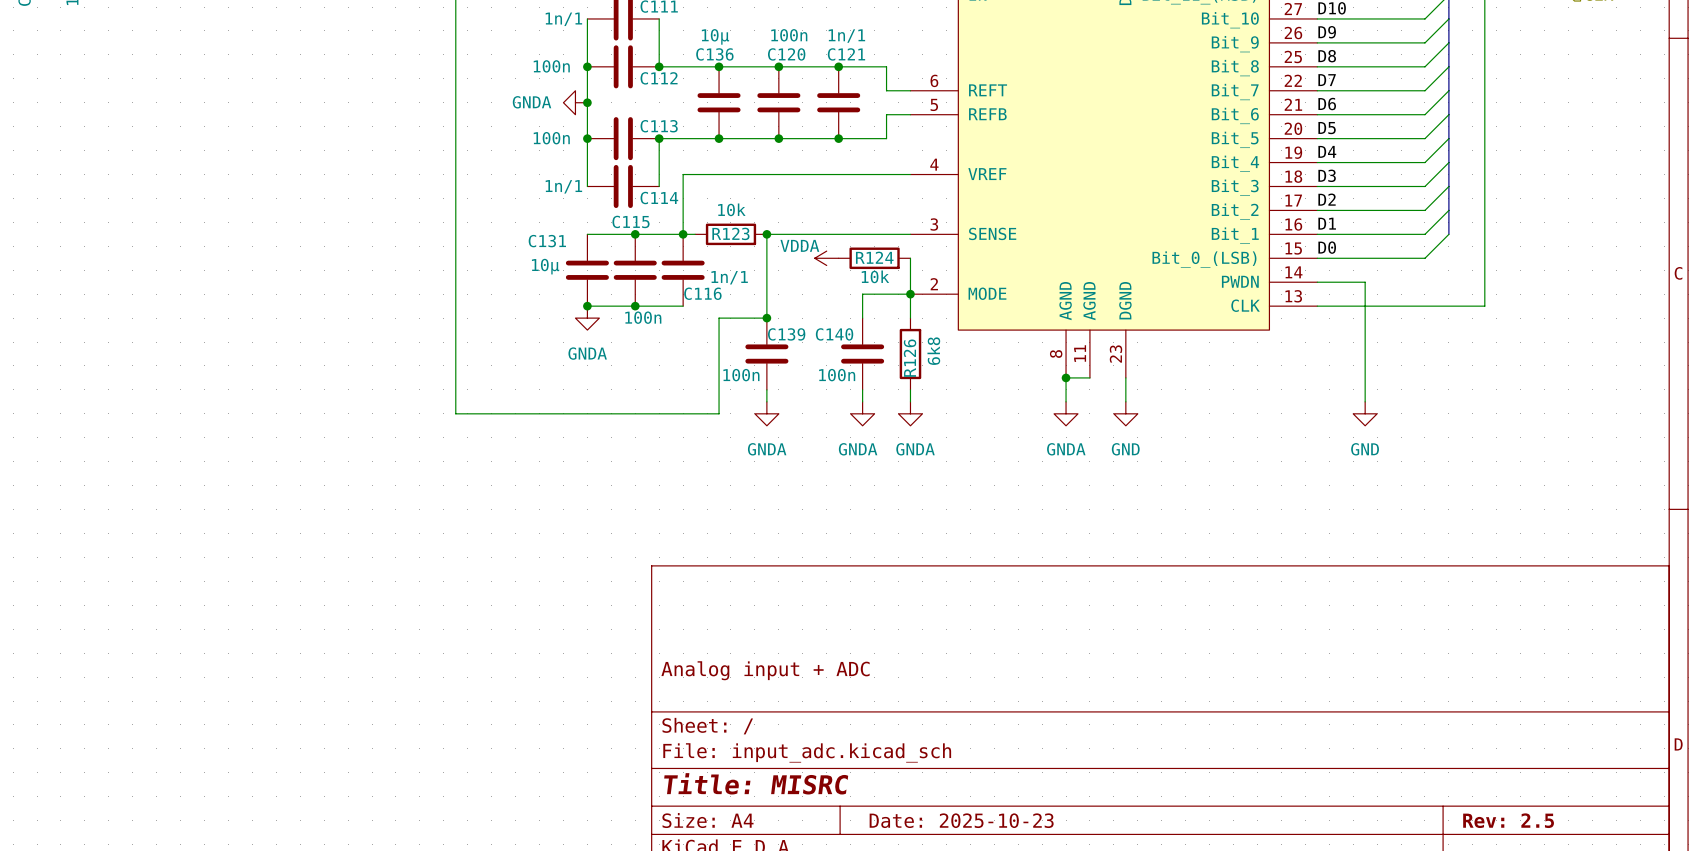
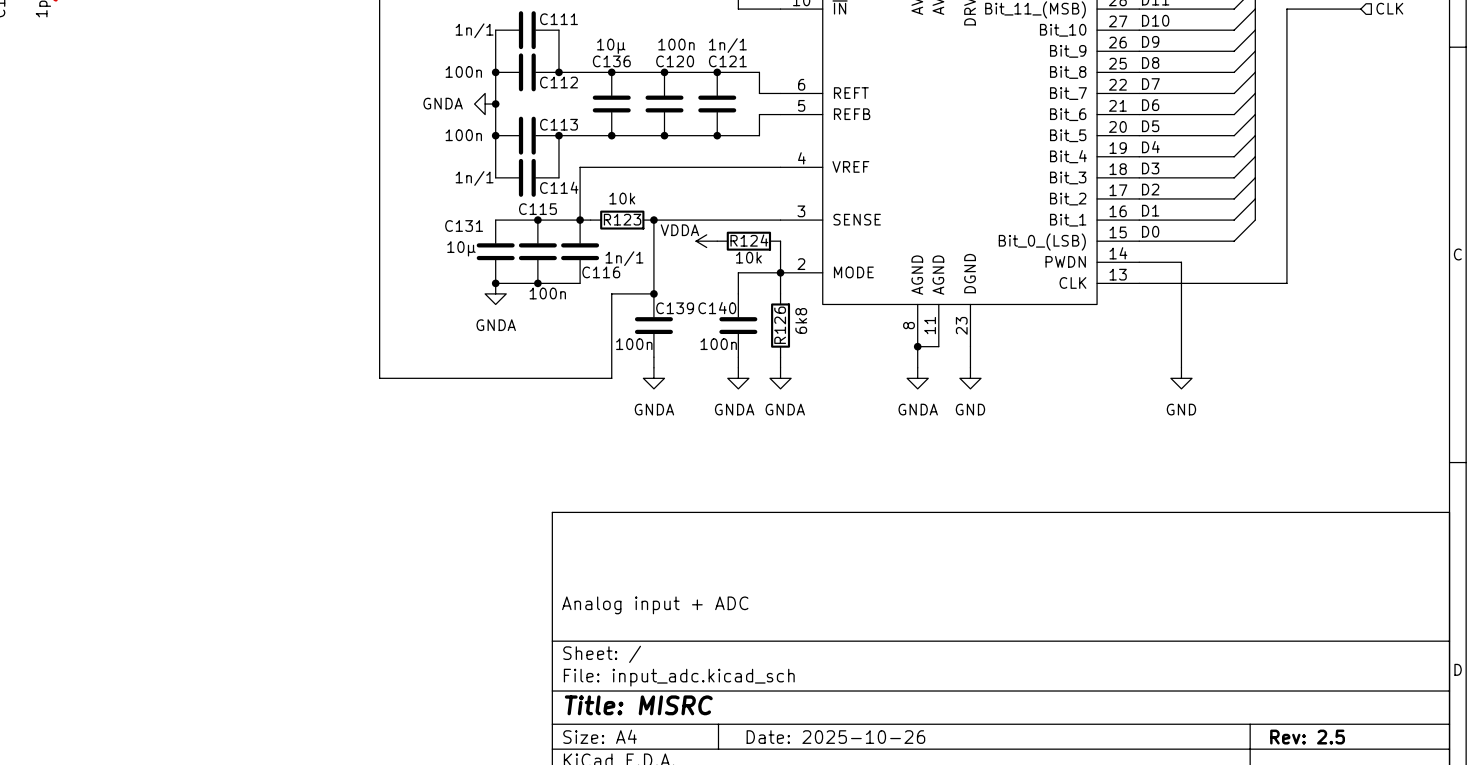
title block: Date: 2025-10-23 (961, 820) -> Date: 2025-10-26 (835, 737)

